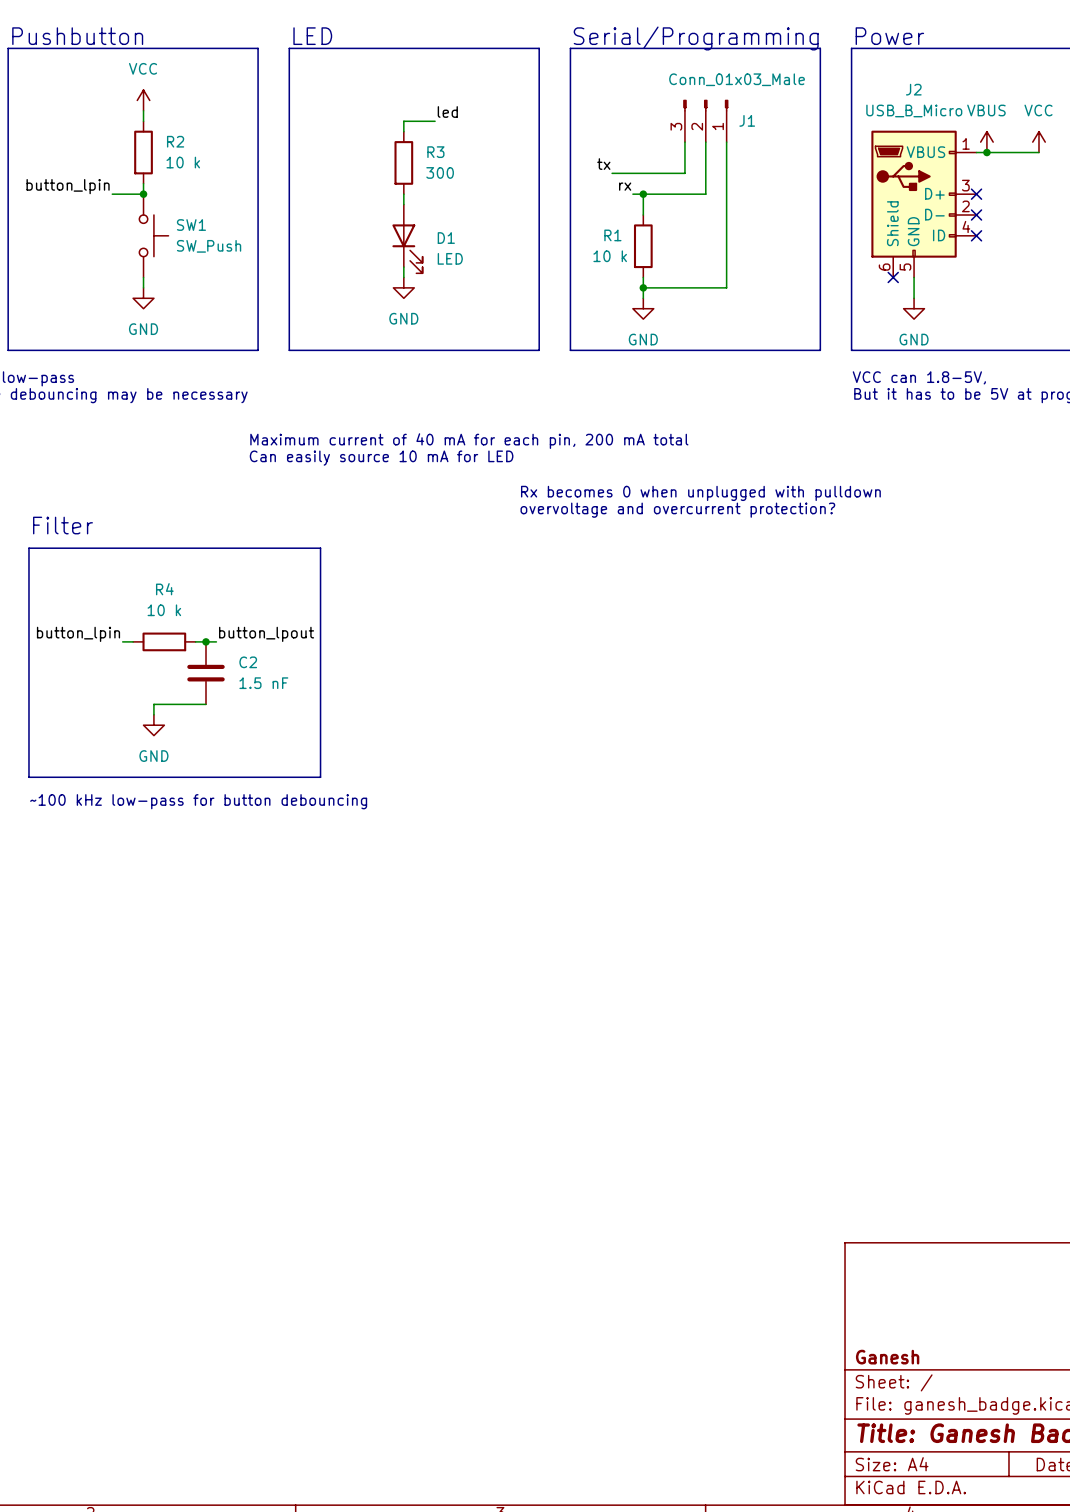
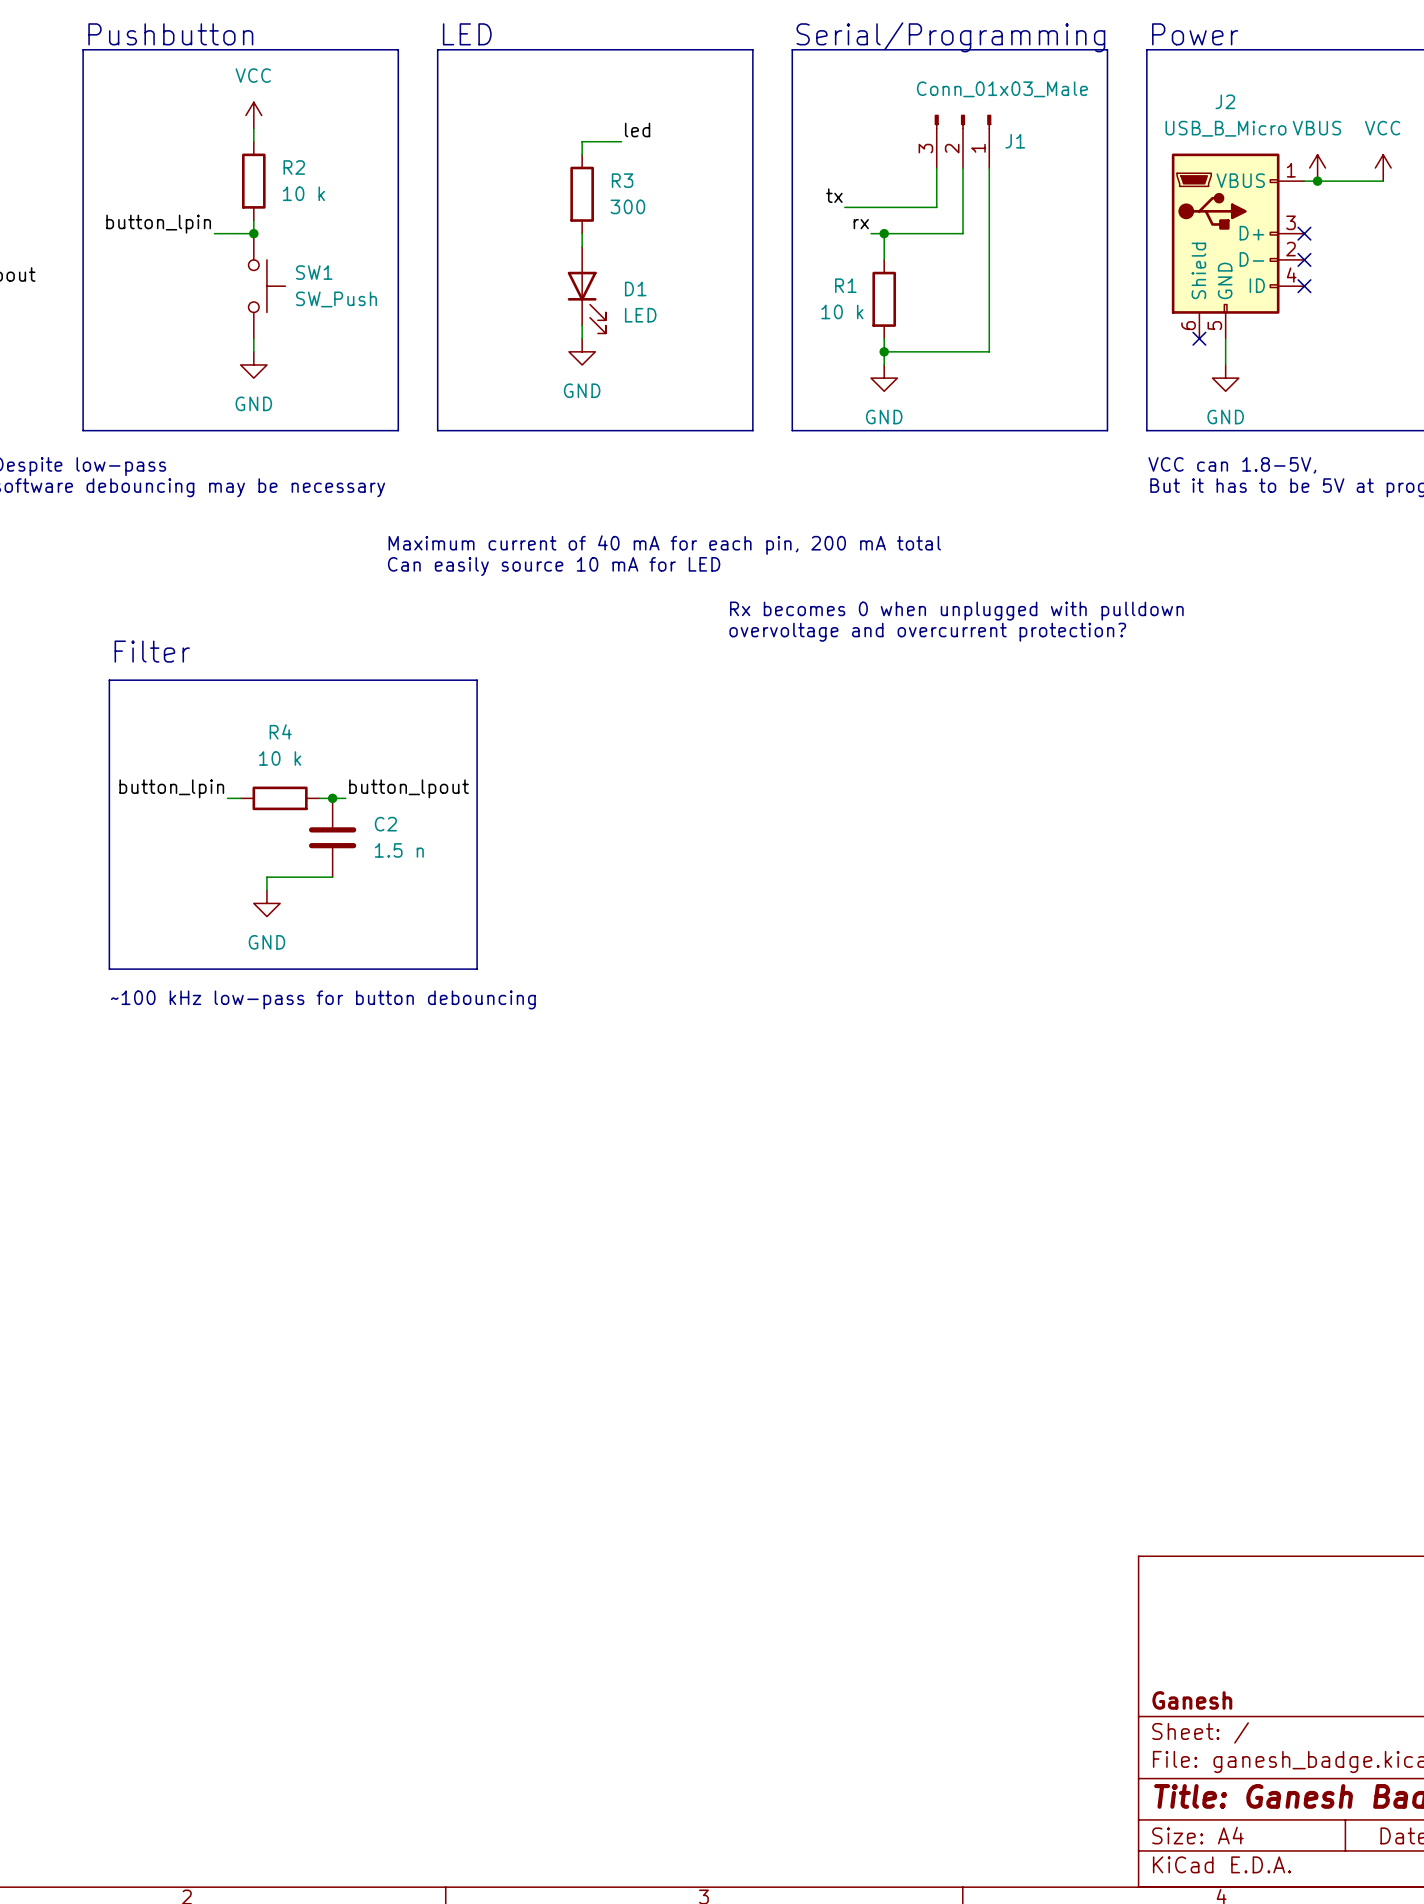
C2 value: 1.5 nF (263, 683) -> 1.5 n (399, 850)

